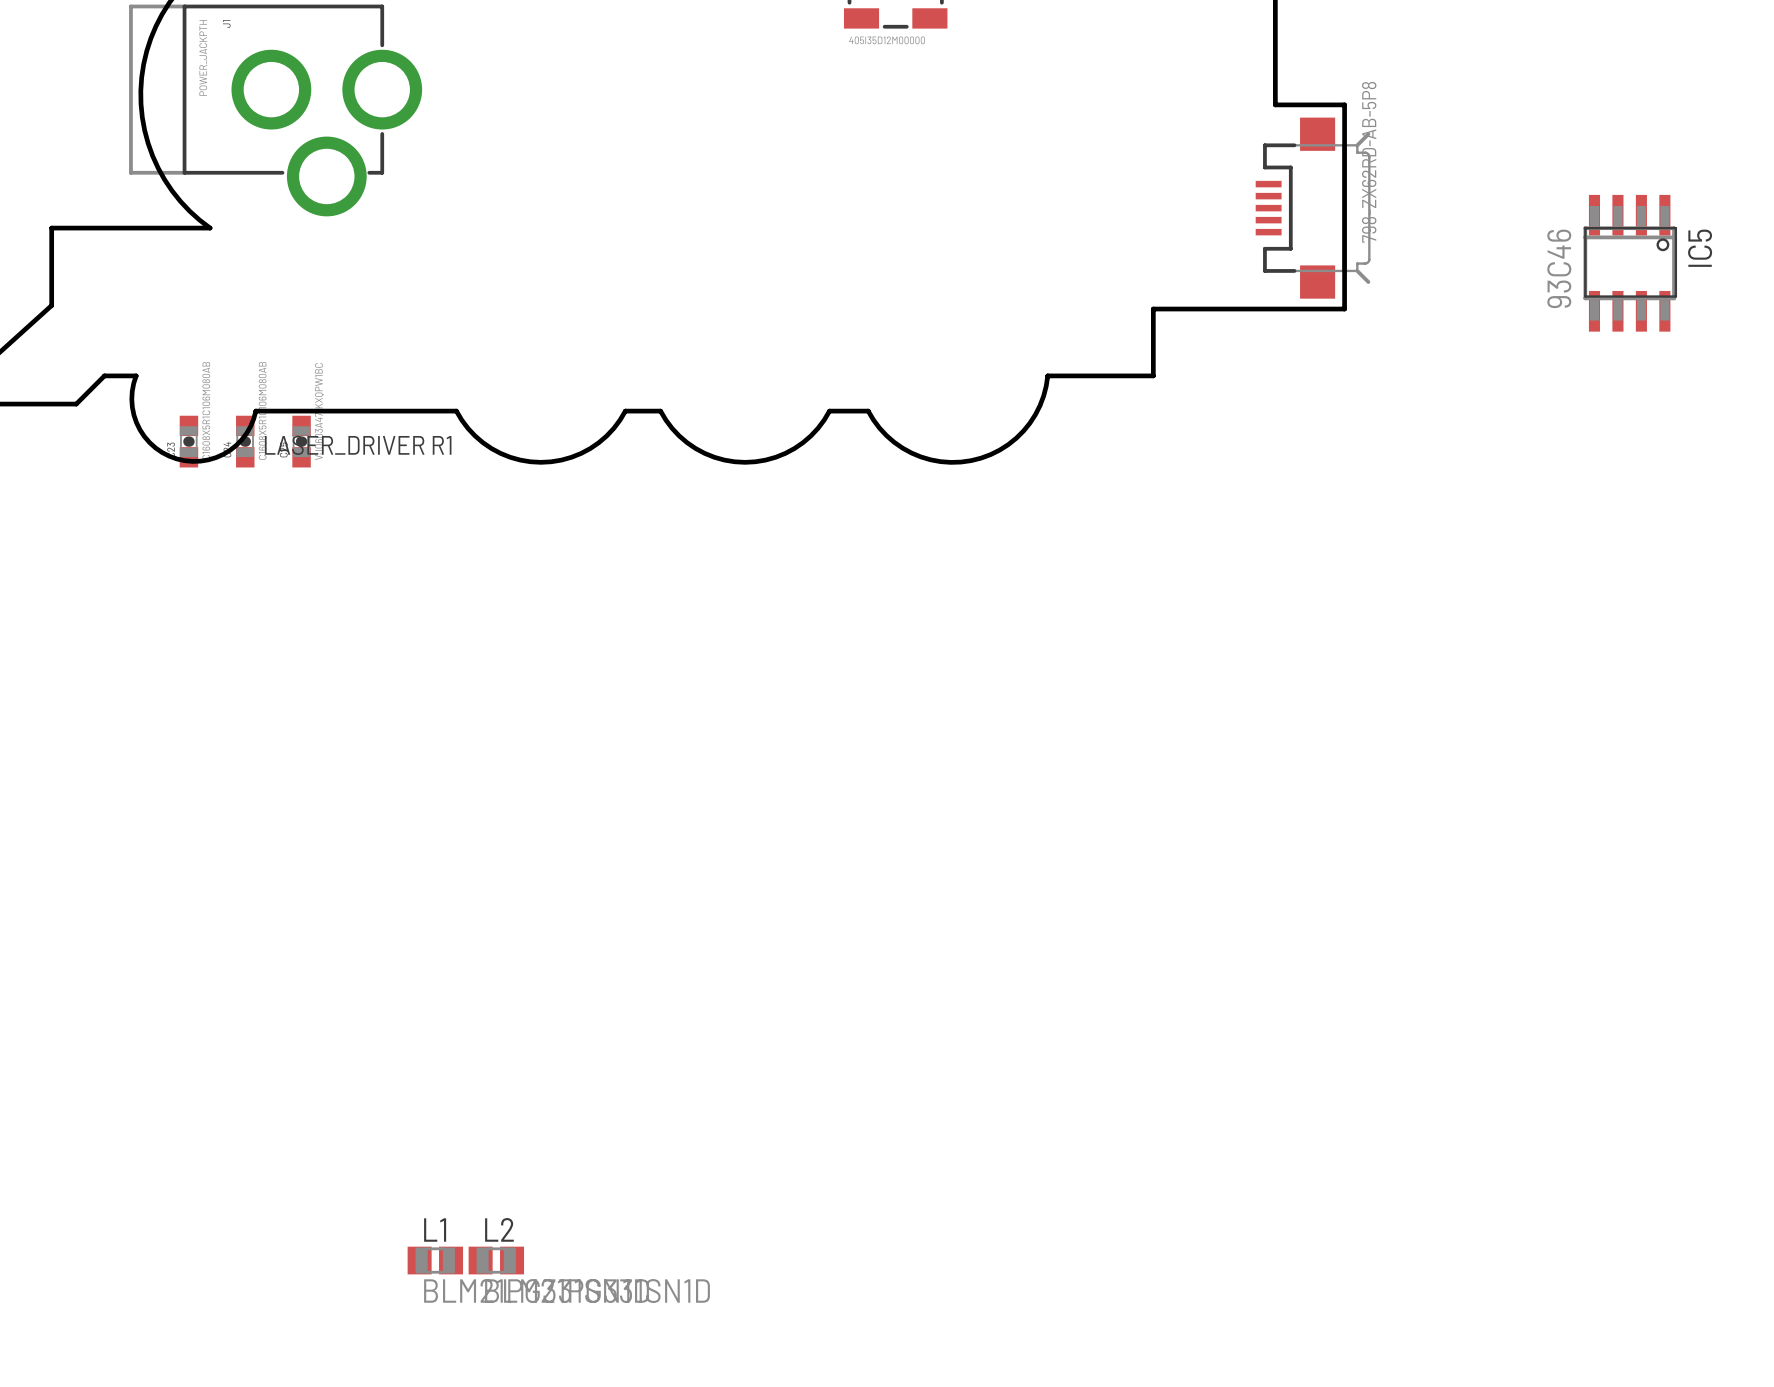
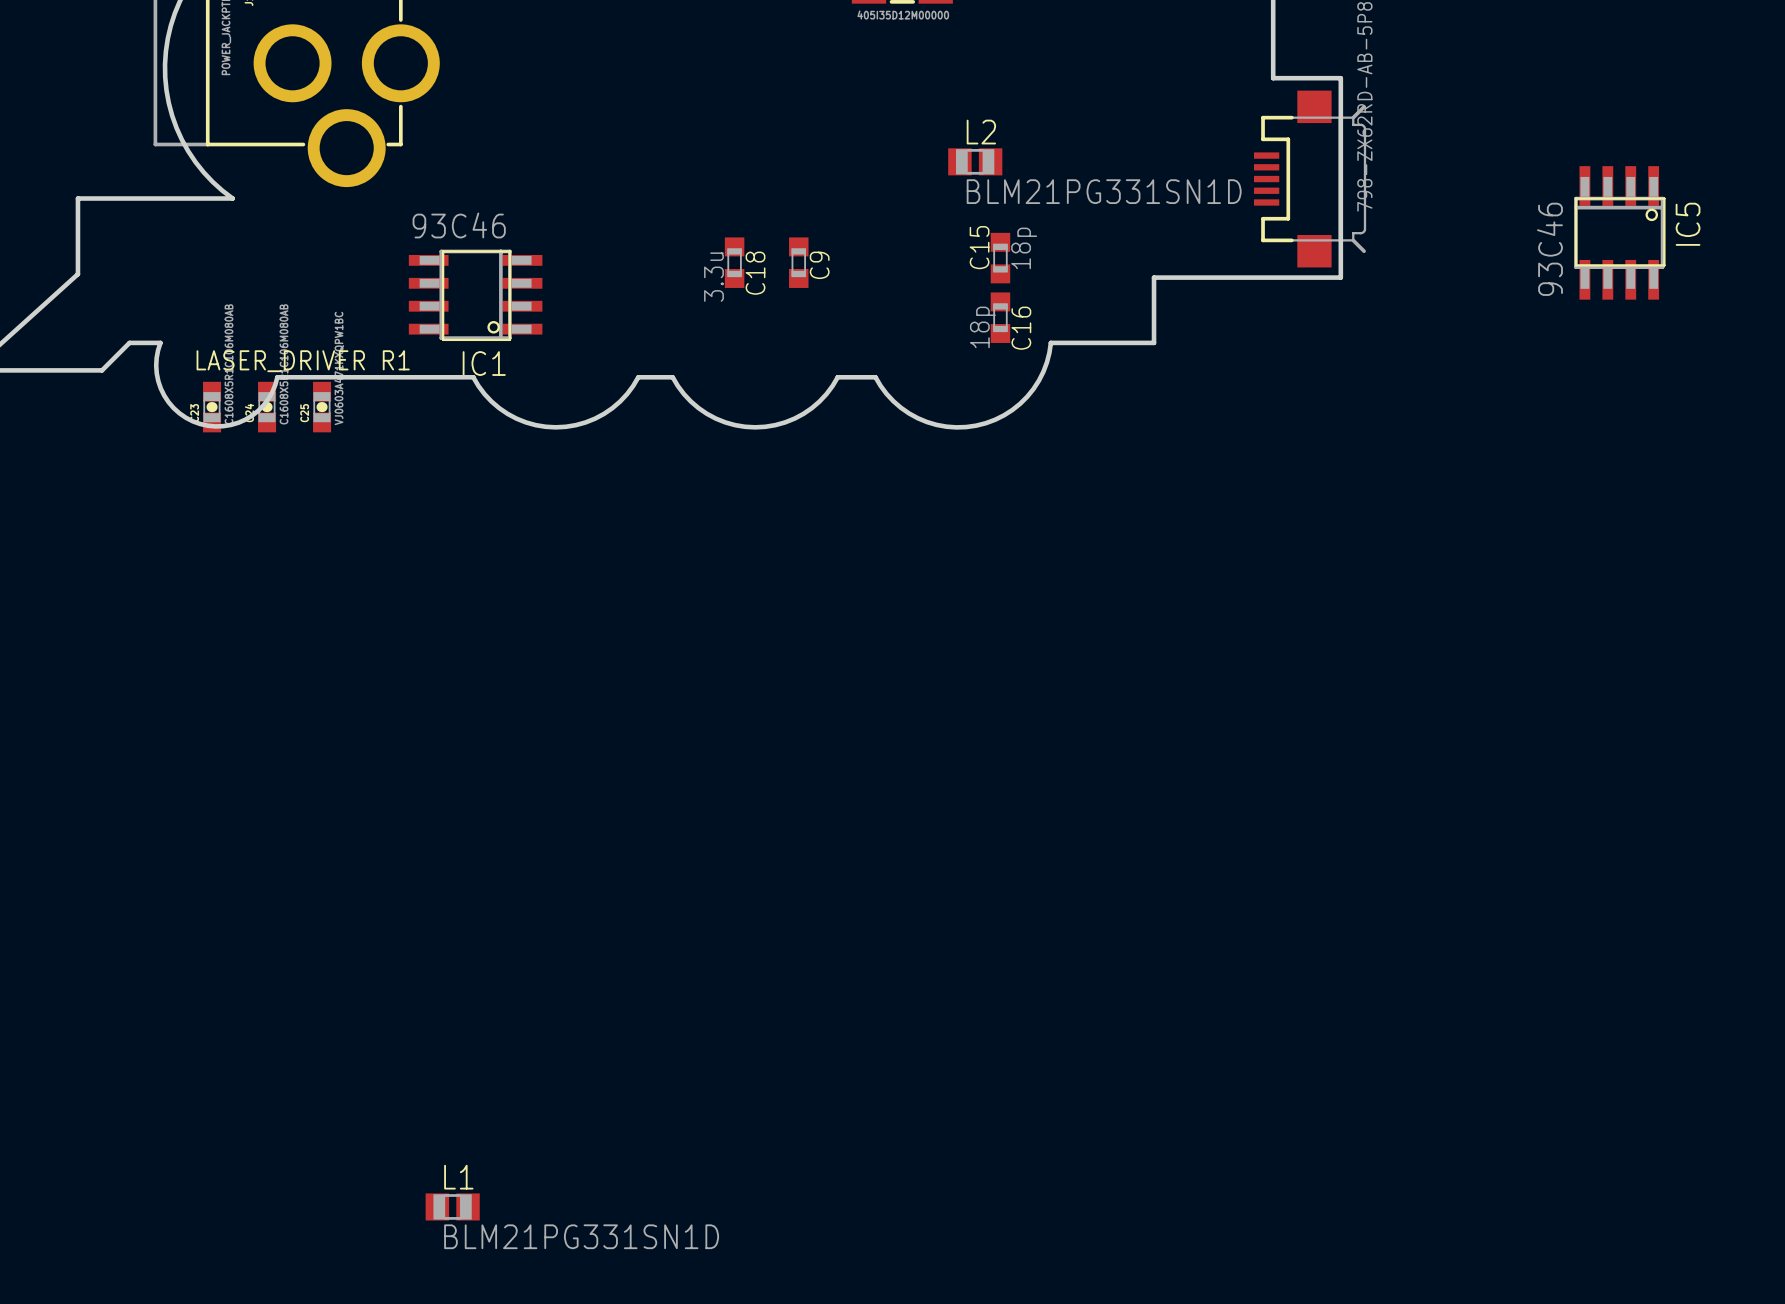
C15: none -> 18p (1000, 258)
C18: none -> 3.3u (734, 262)
C9: none -> (798, 262)
IC1: none -> 93C46 (475, 295)
C16: none -> 18p (1000, 317)
text position: LASER_DRIVER R1 (358, 445) -> LASER_DRIVER R1 (303, 361)
L2 position: (496, 1260) -> (975, 161)

